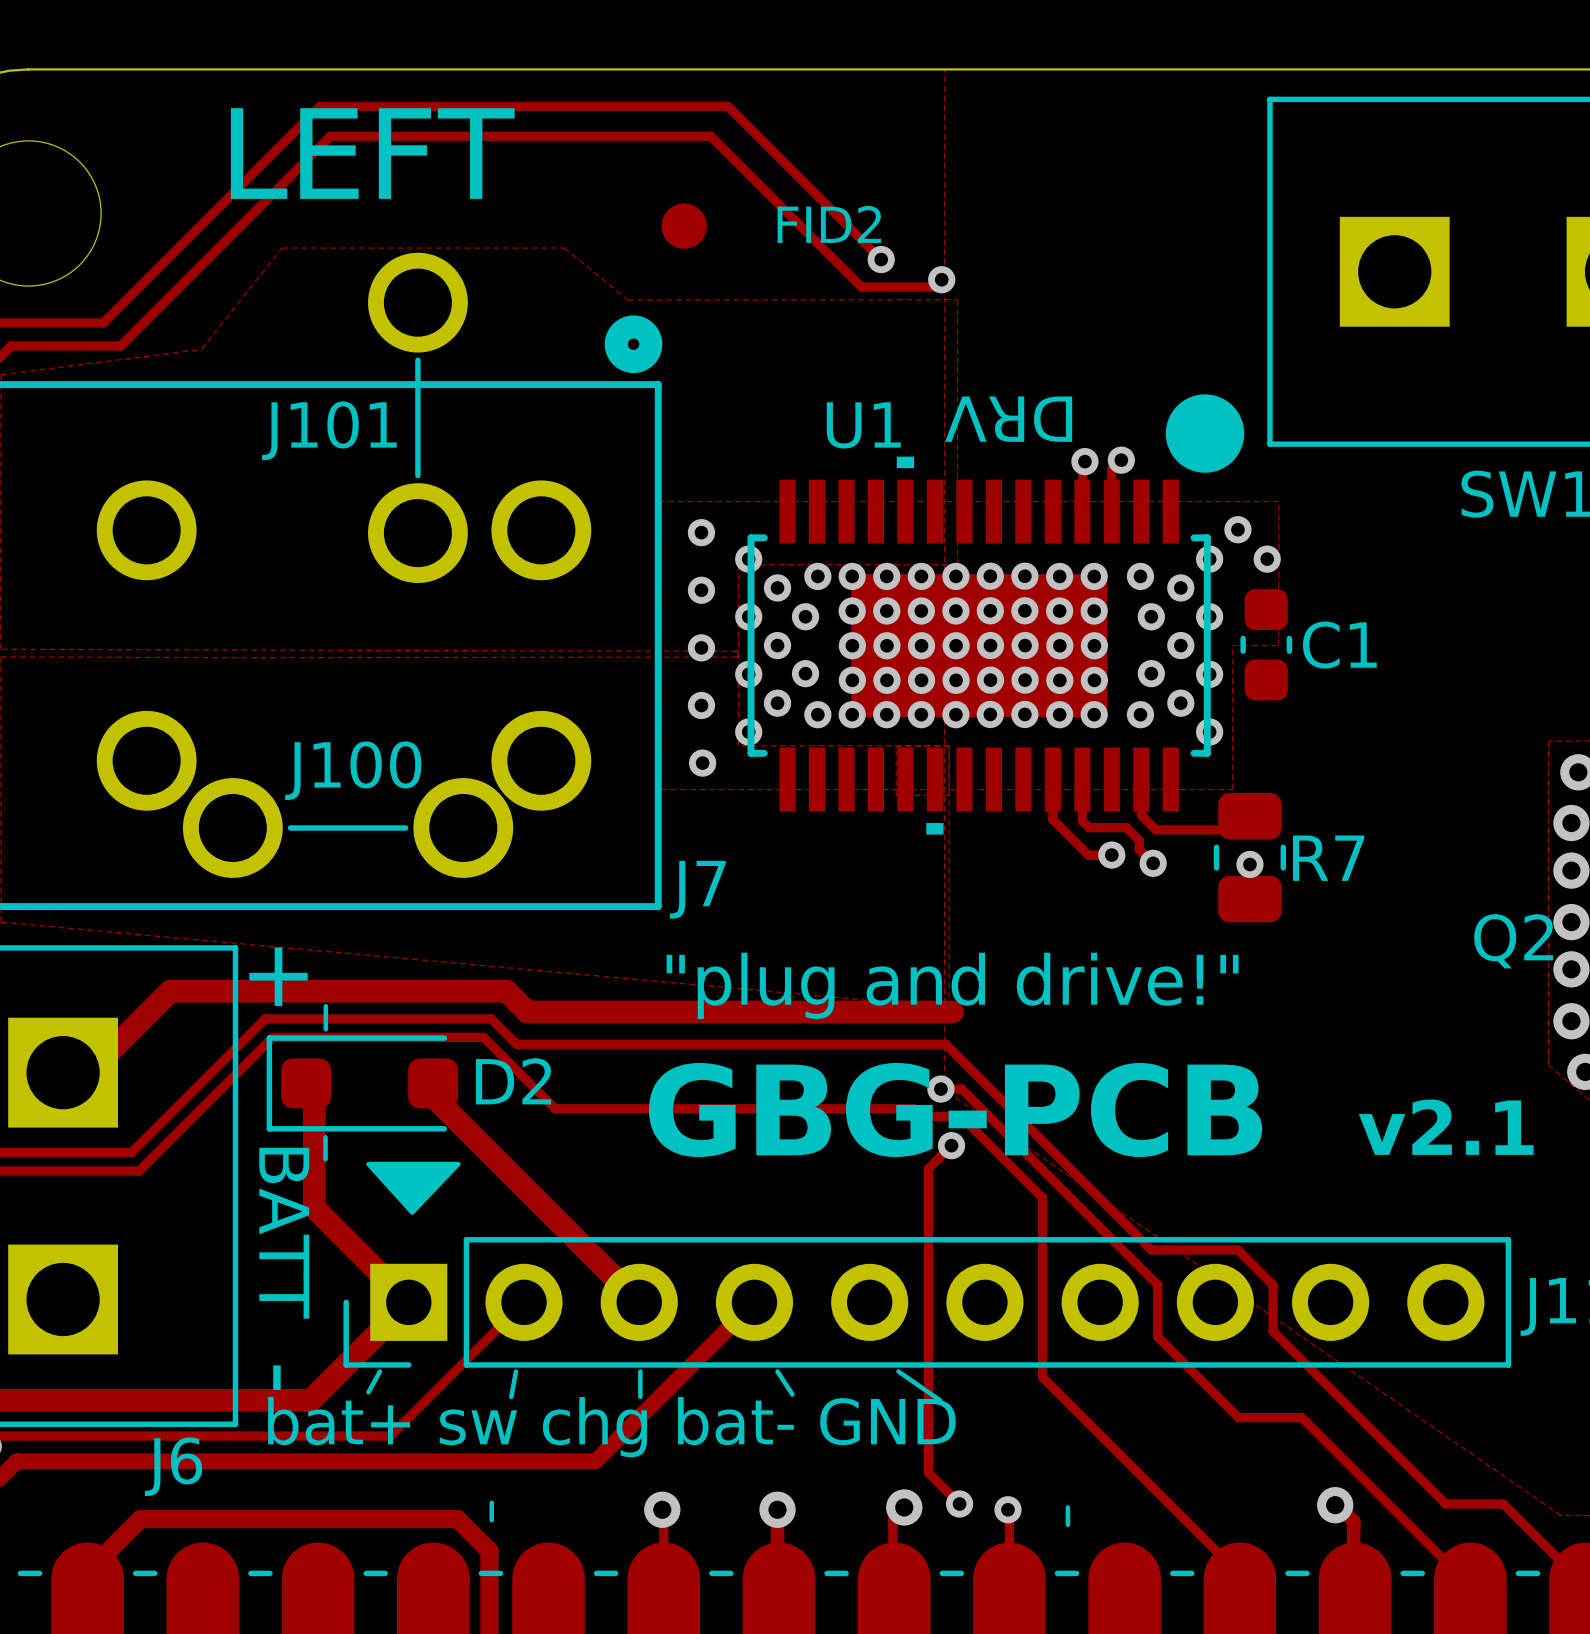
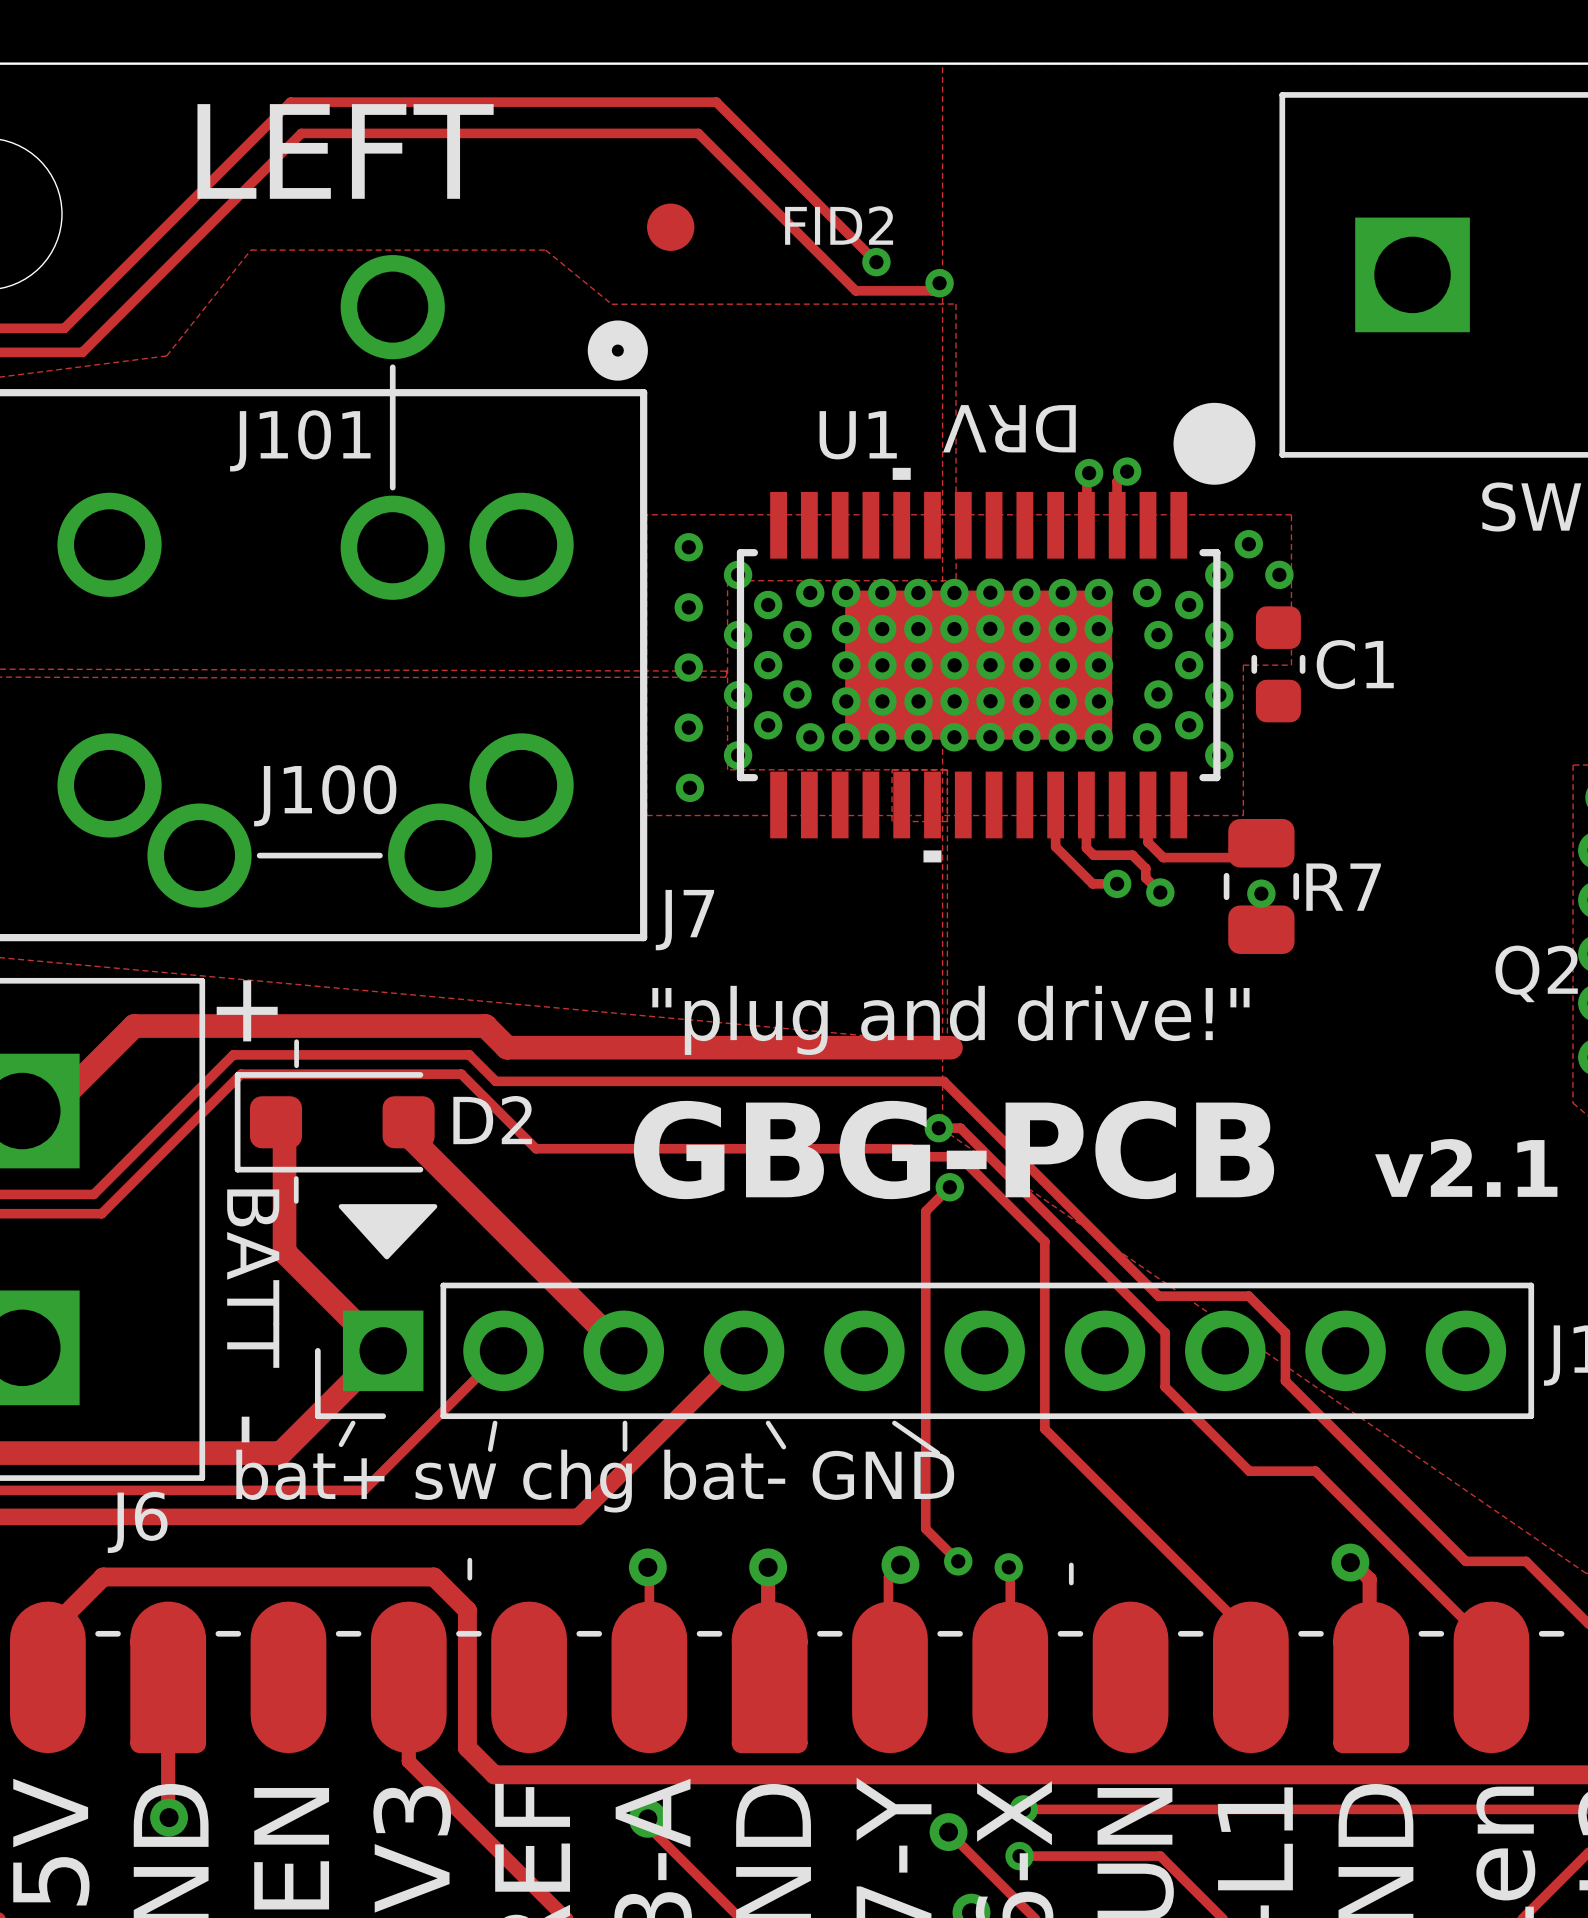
FID2 name position: FID2 (829, 224) -> FID2 (839, 225)

